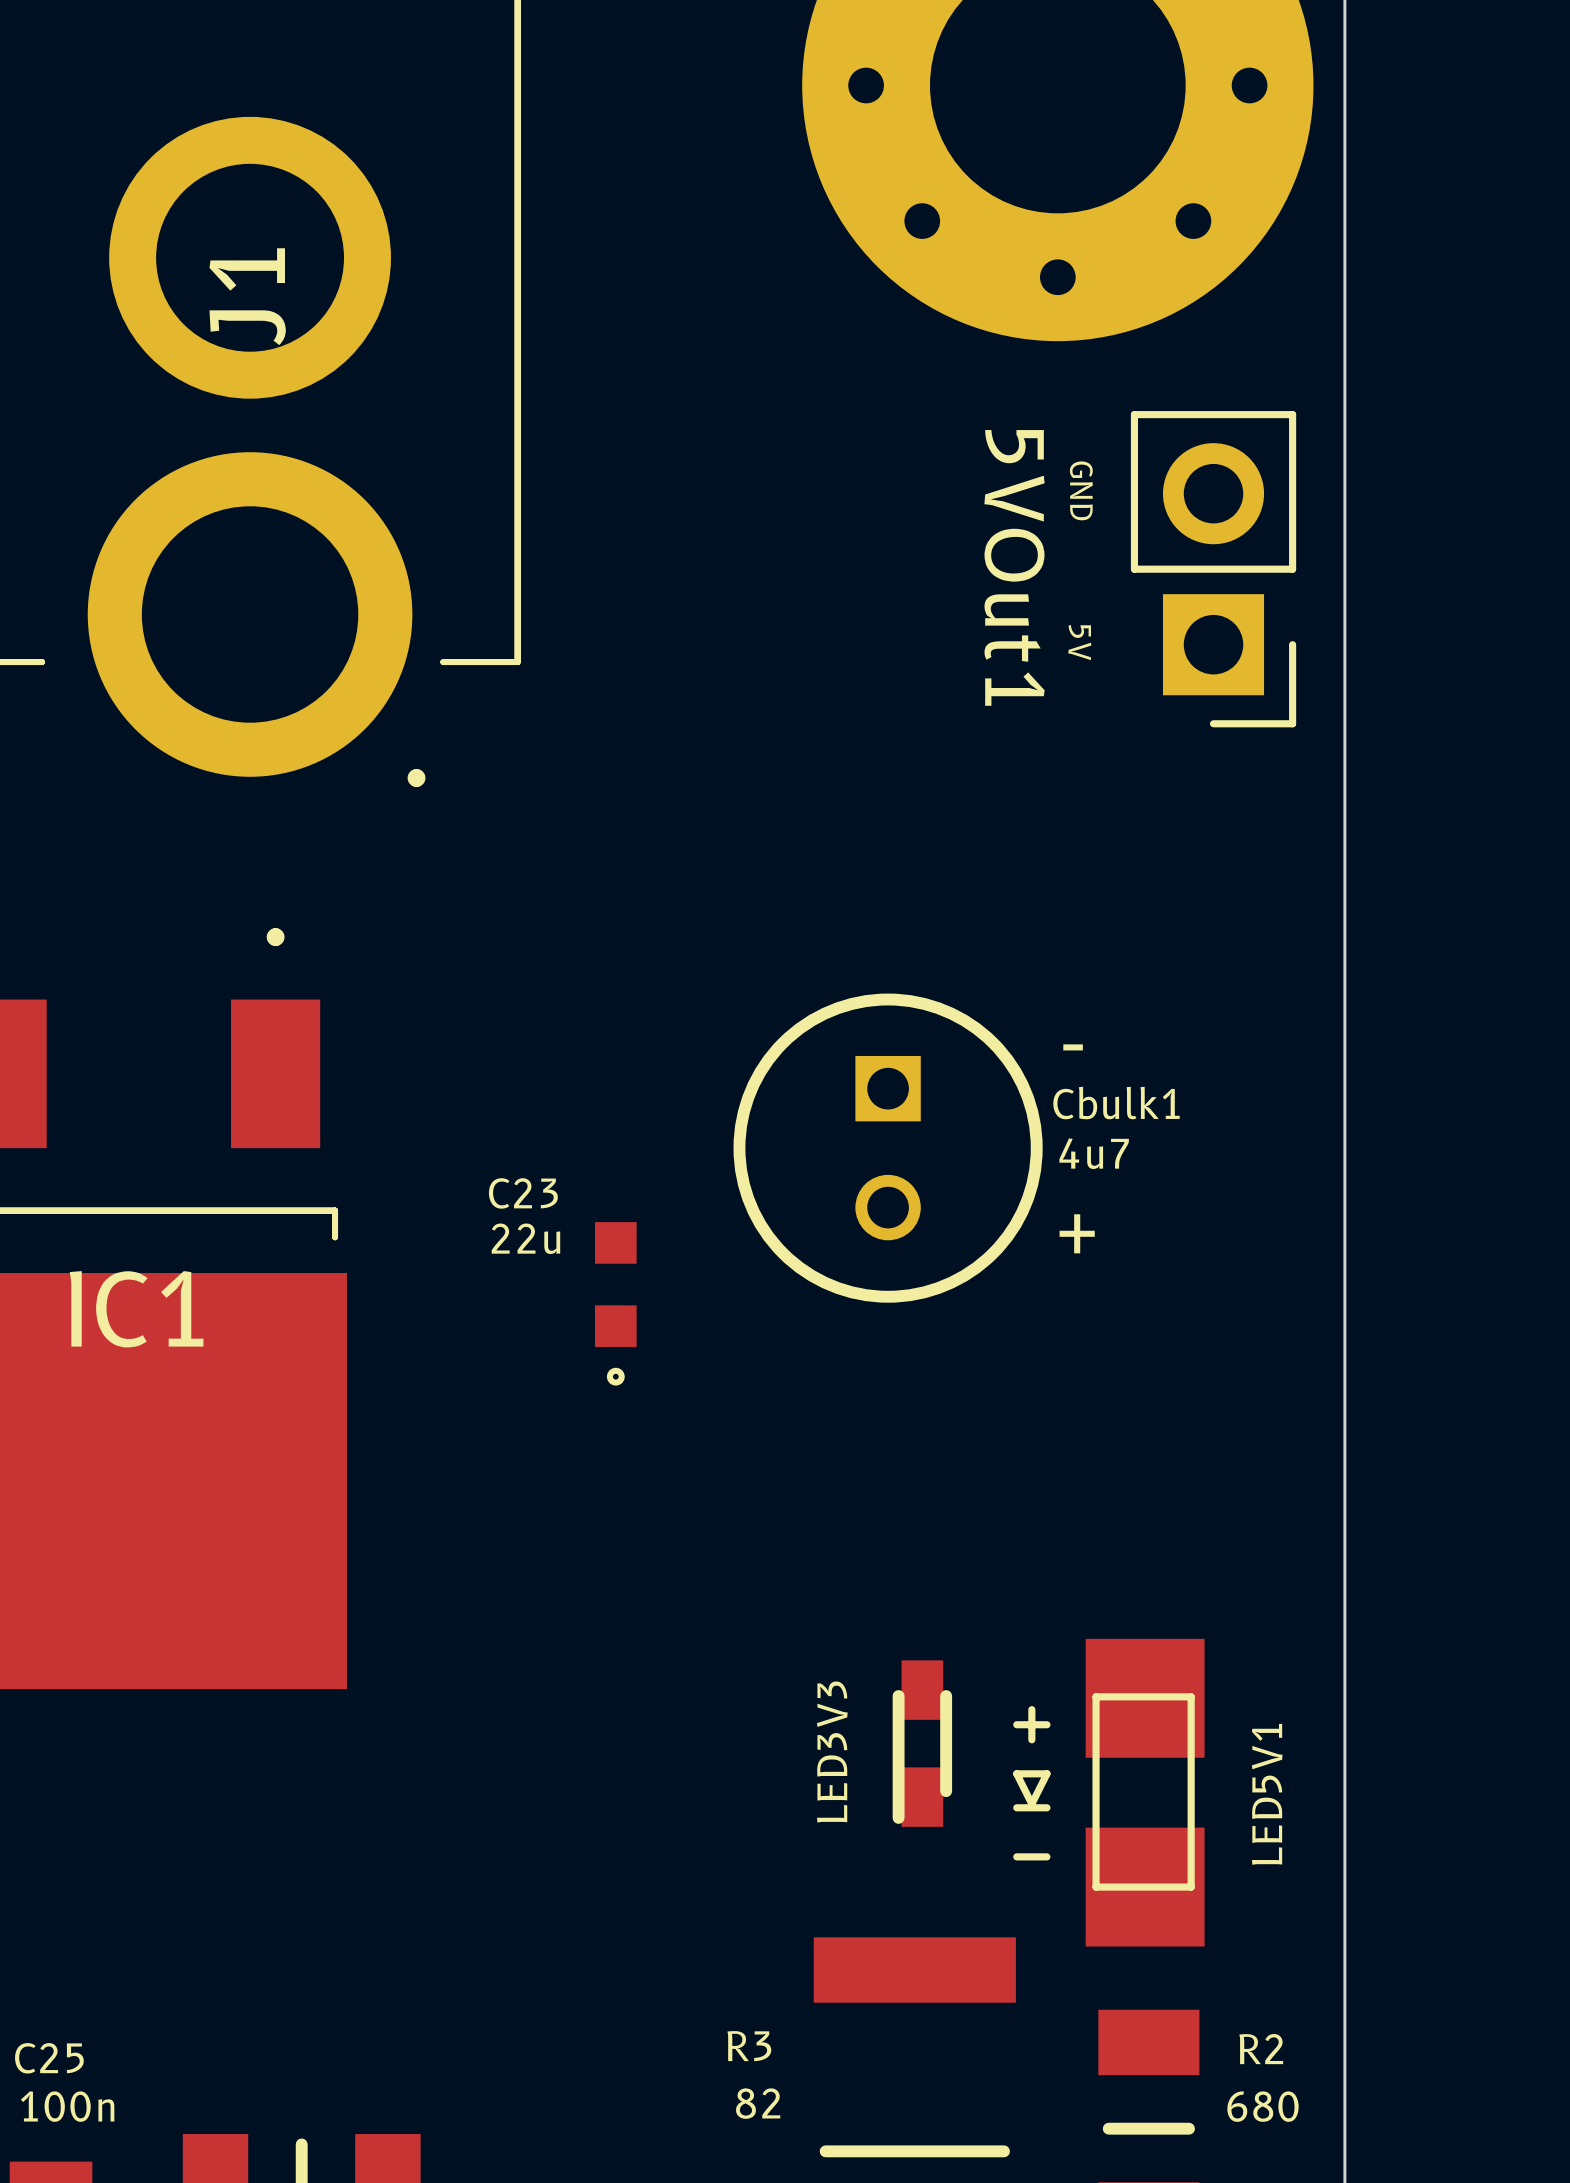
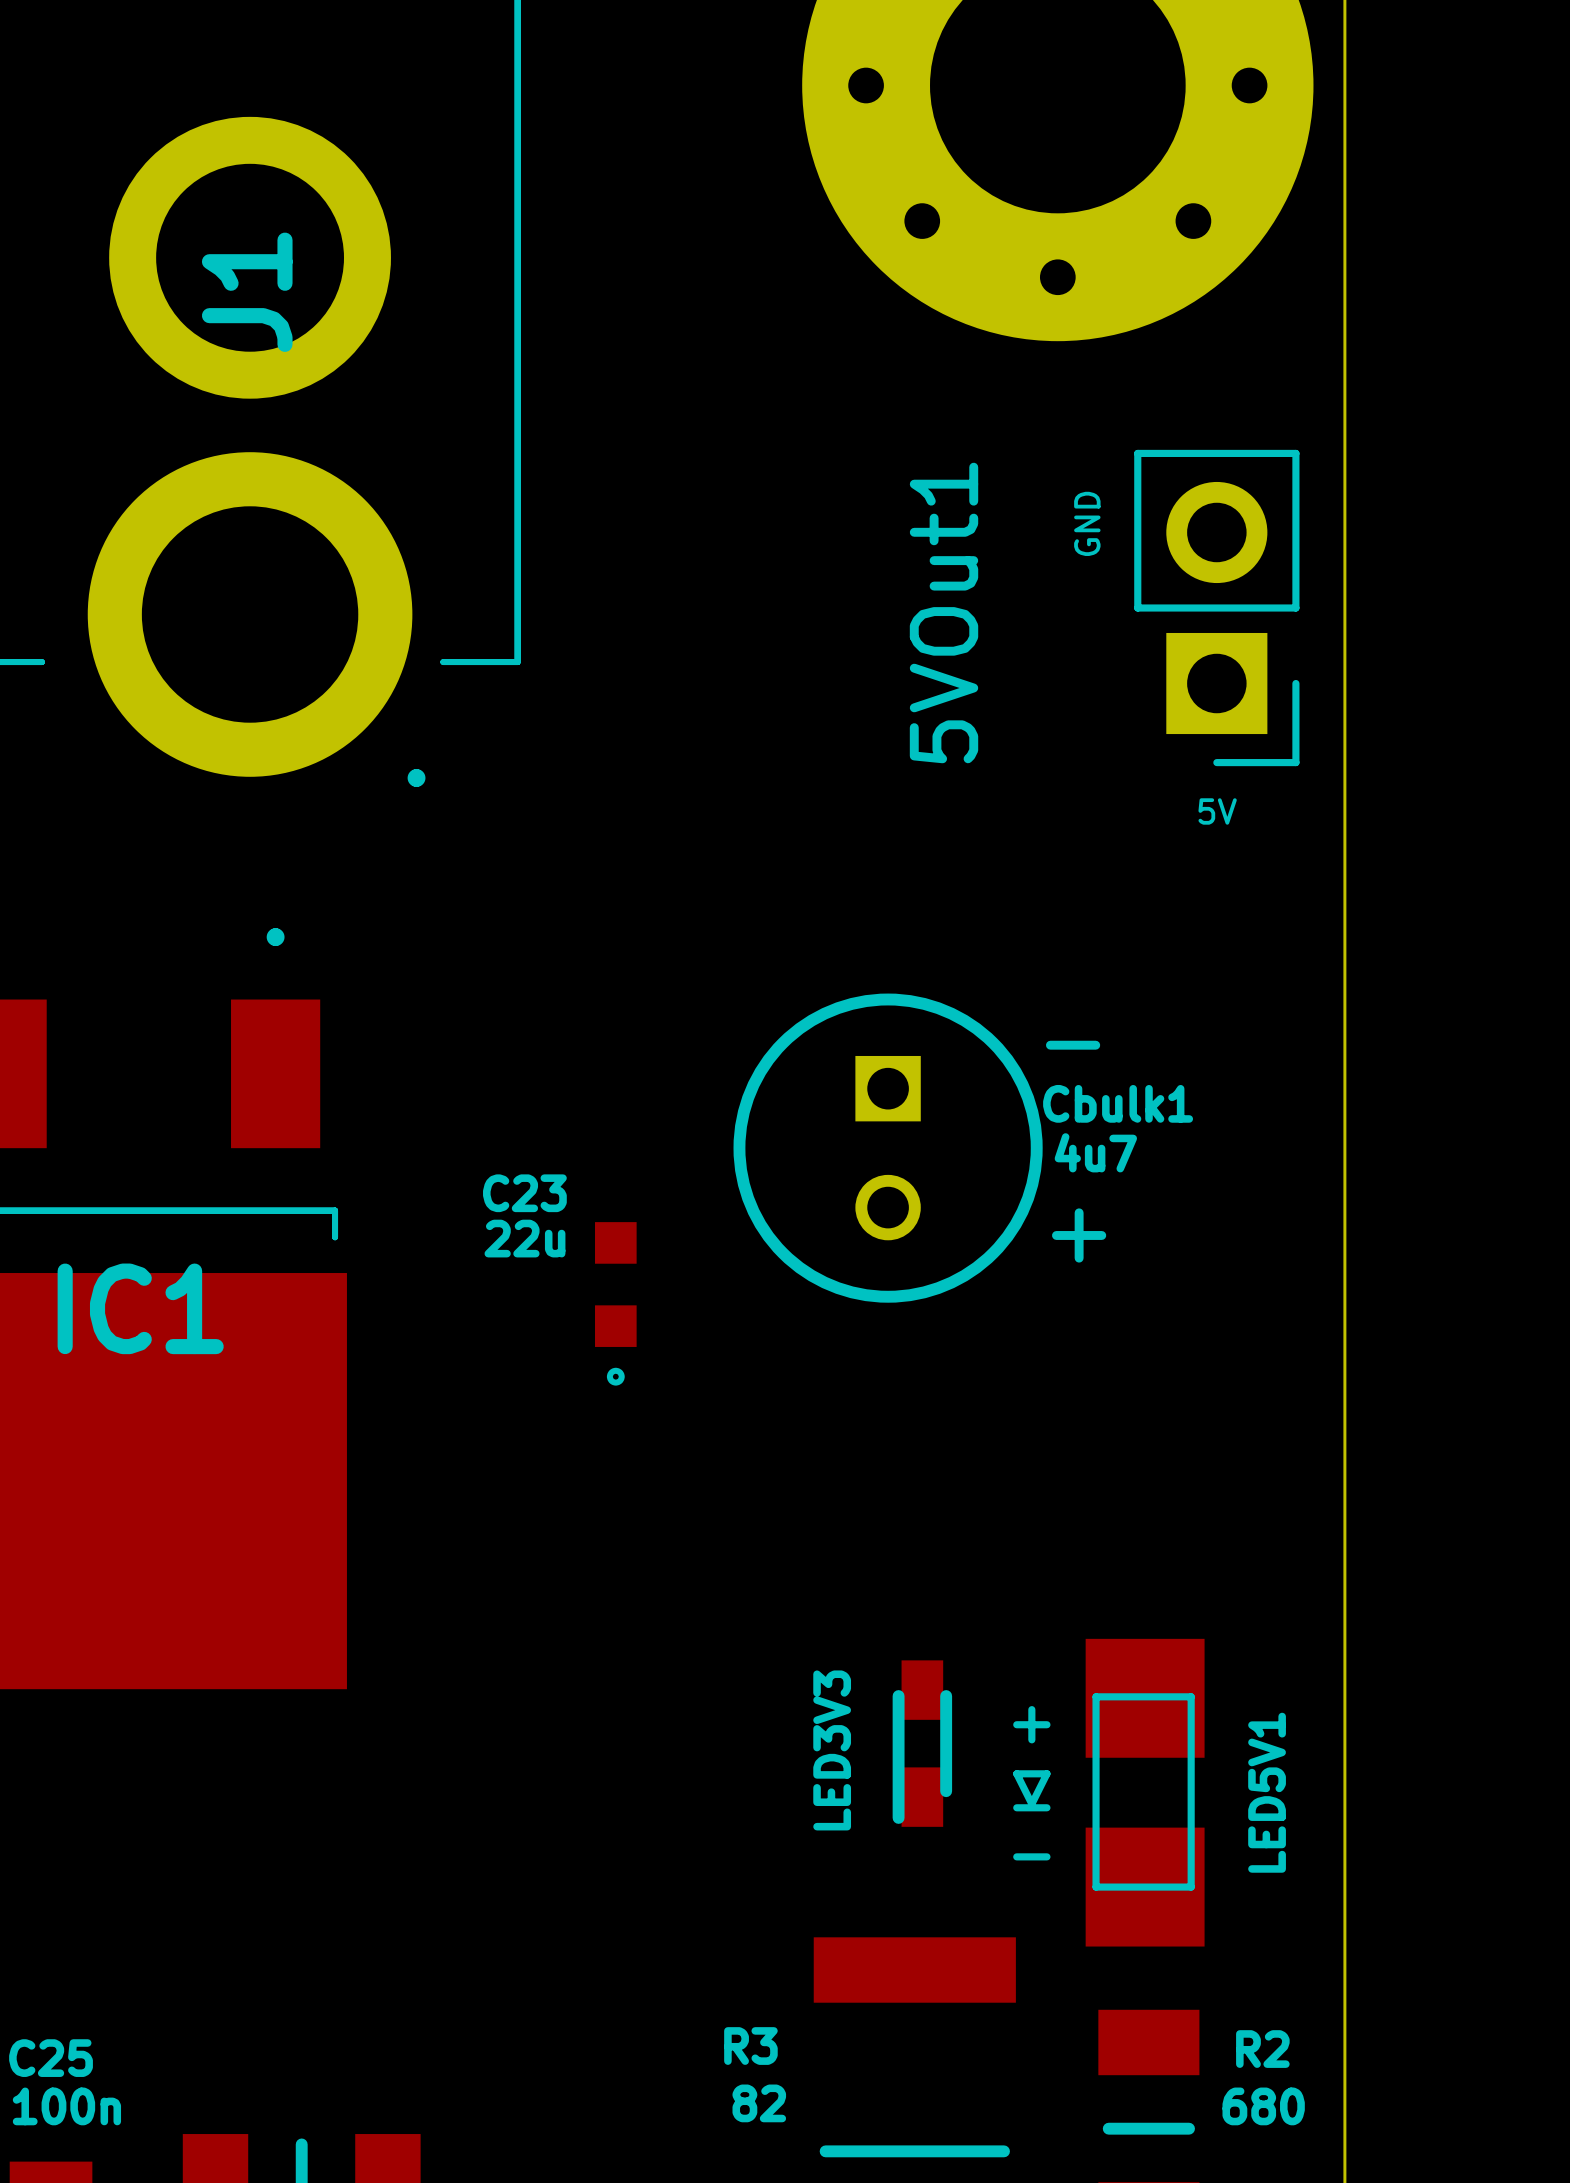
text rotation: 0° (1081, 490) -> 180° (1087, 523)
5VOut1 name rotation: 0° (1014, 567) -> 180° (944, 612)
5VOut1 position: (1213, 569) -> (1216, 608)
text rotation: 0° (1079, 642) -> 90° counterclockwise (1217, 811)
text position: 5V (1079, 642) -> 5V (1217, 811)

